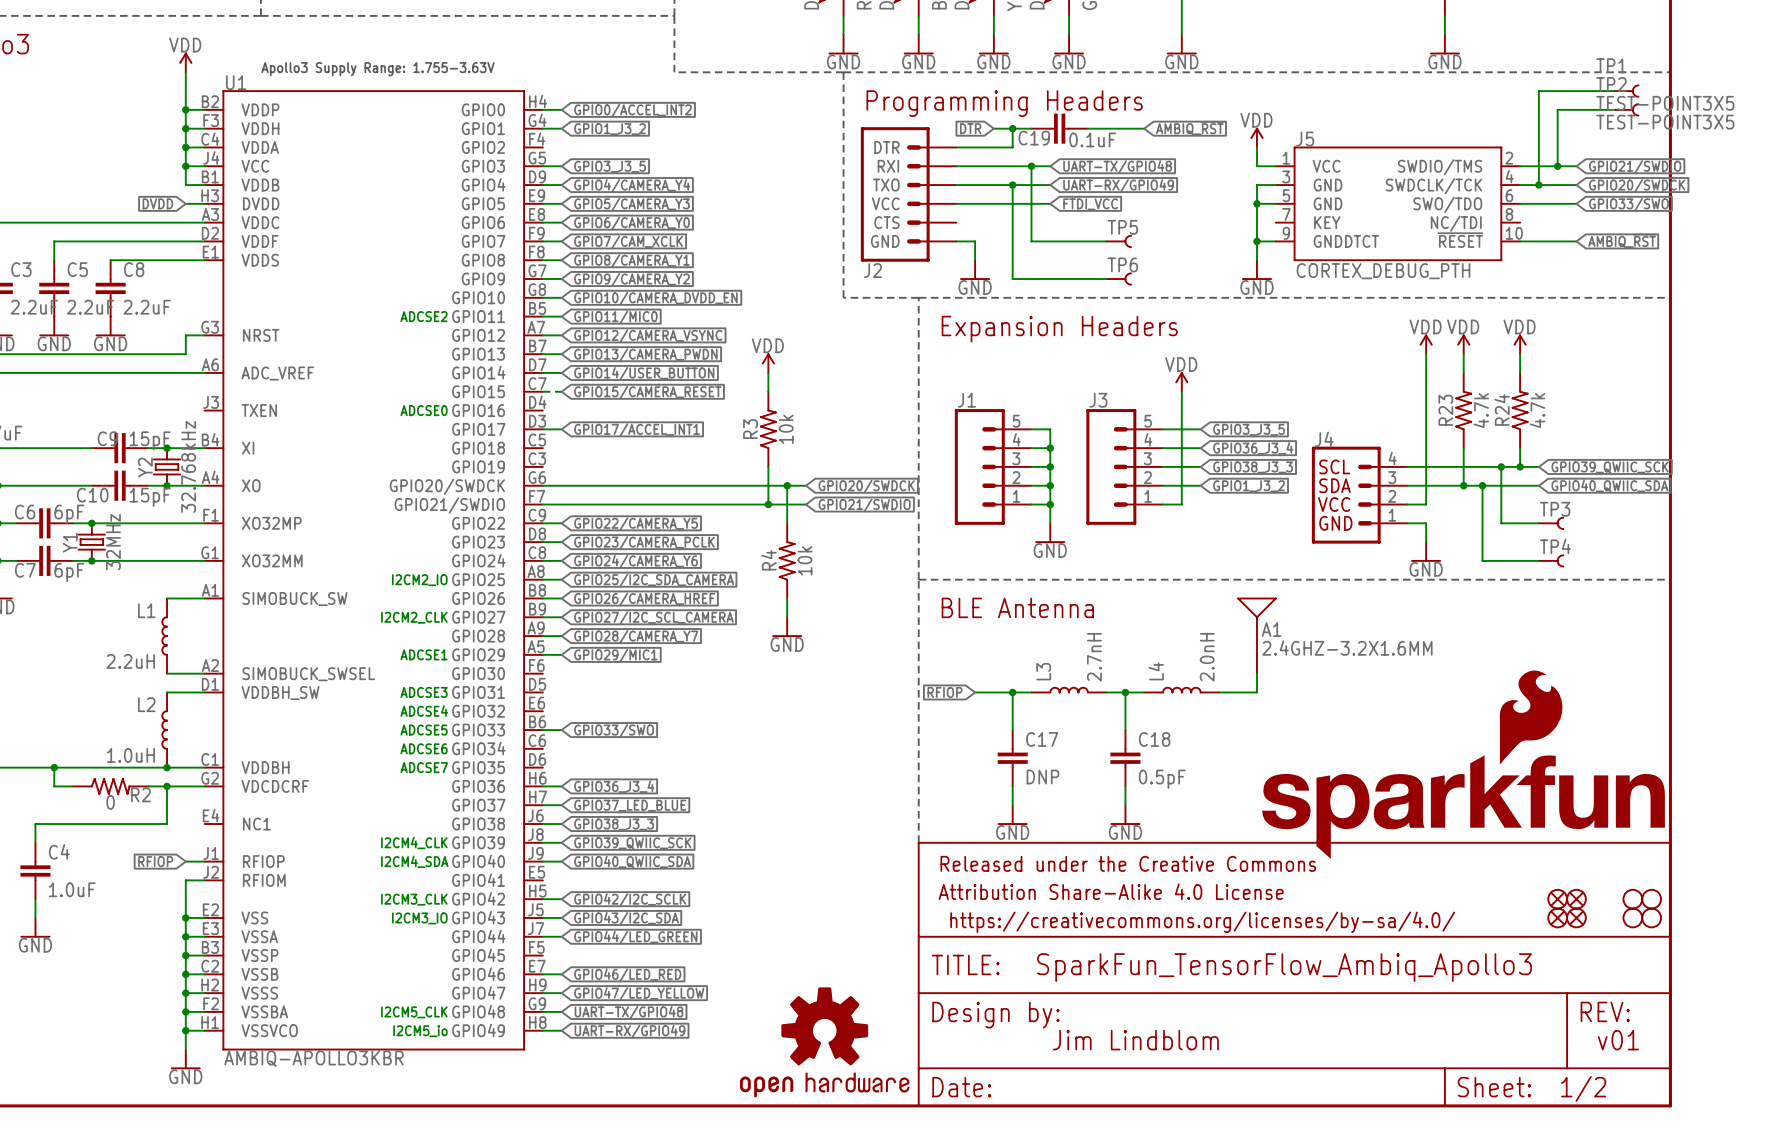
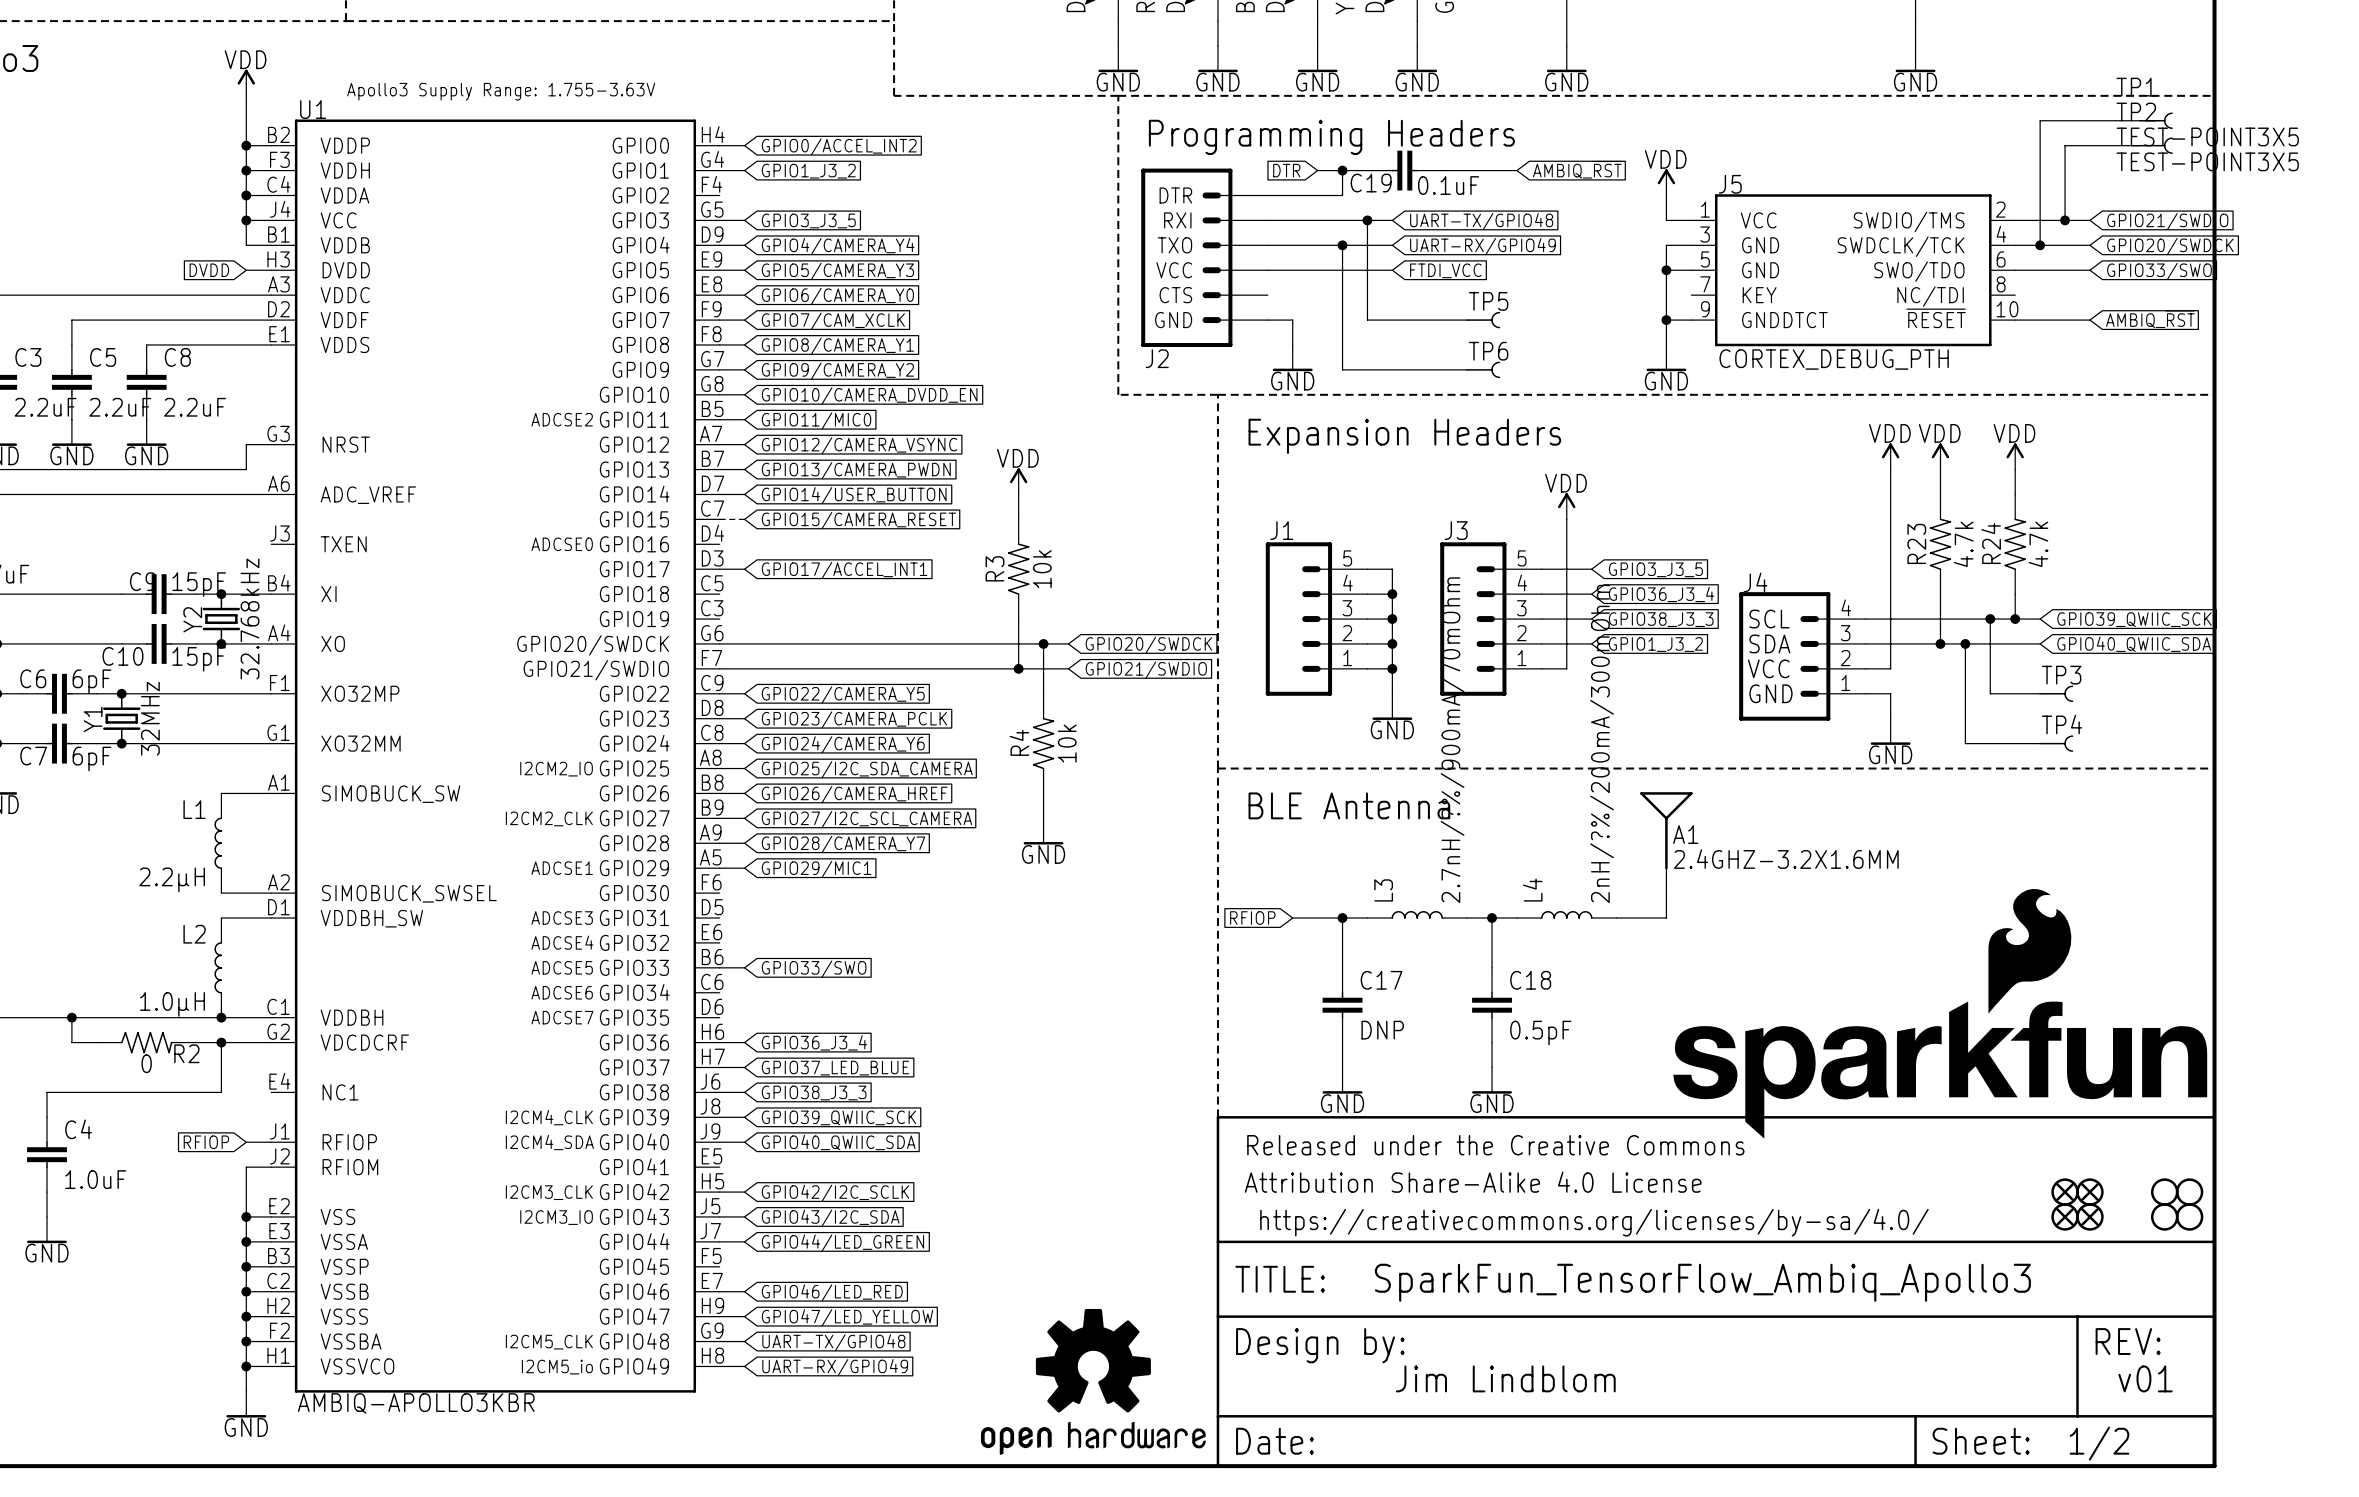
L3 value: 2.7nH (1094, 657) -> 2.7nH/?%/900mA/70mOhm (1452, 740)
L4 value: 2.0nH (1207, 657) -> 2nH/?%/200mA/300mOhm (1602, 743)
L1 value: 2.2uH (130, 661) -> 2.2μH (172, 879)
L2 value: 1.0uH (130, 755) -> 1.0μH (172, 1004)

